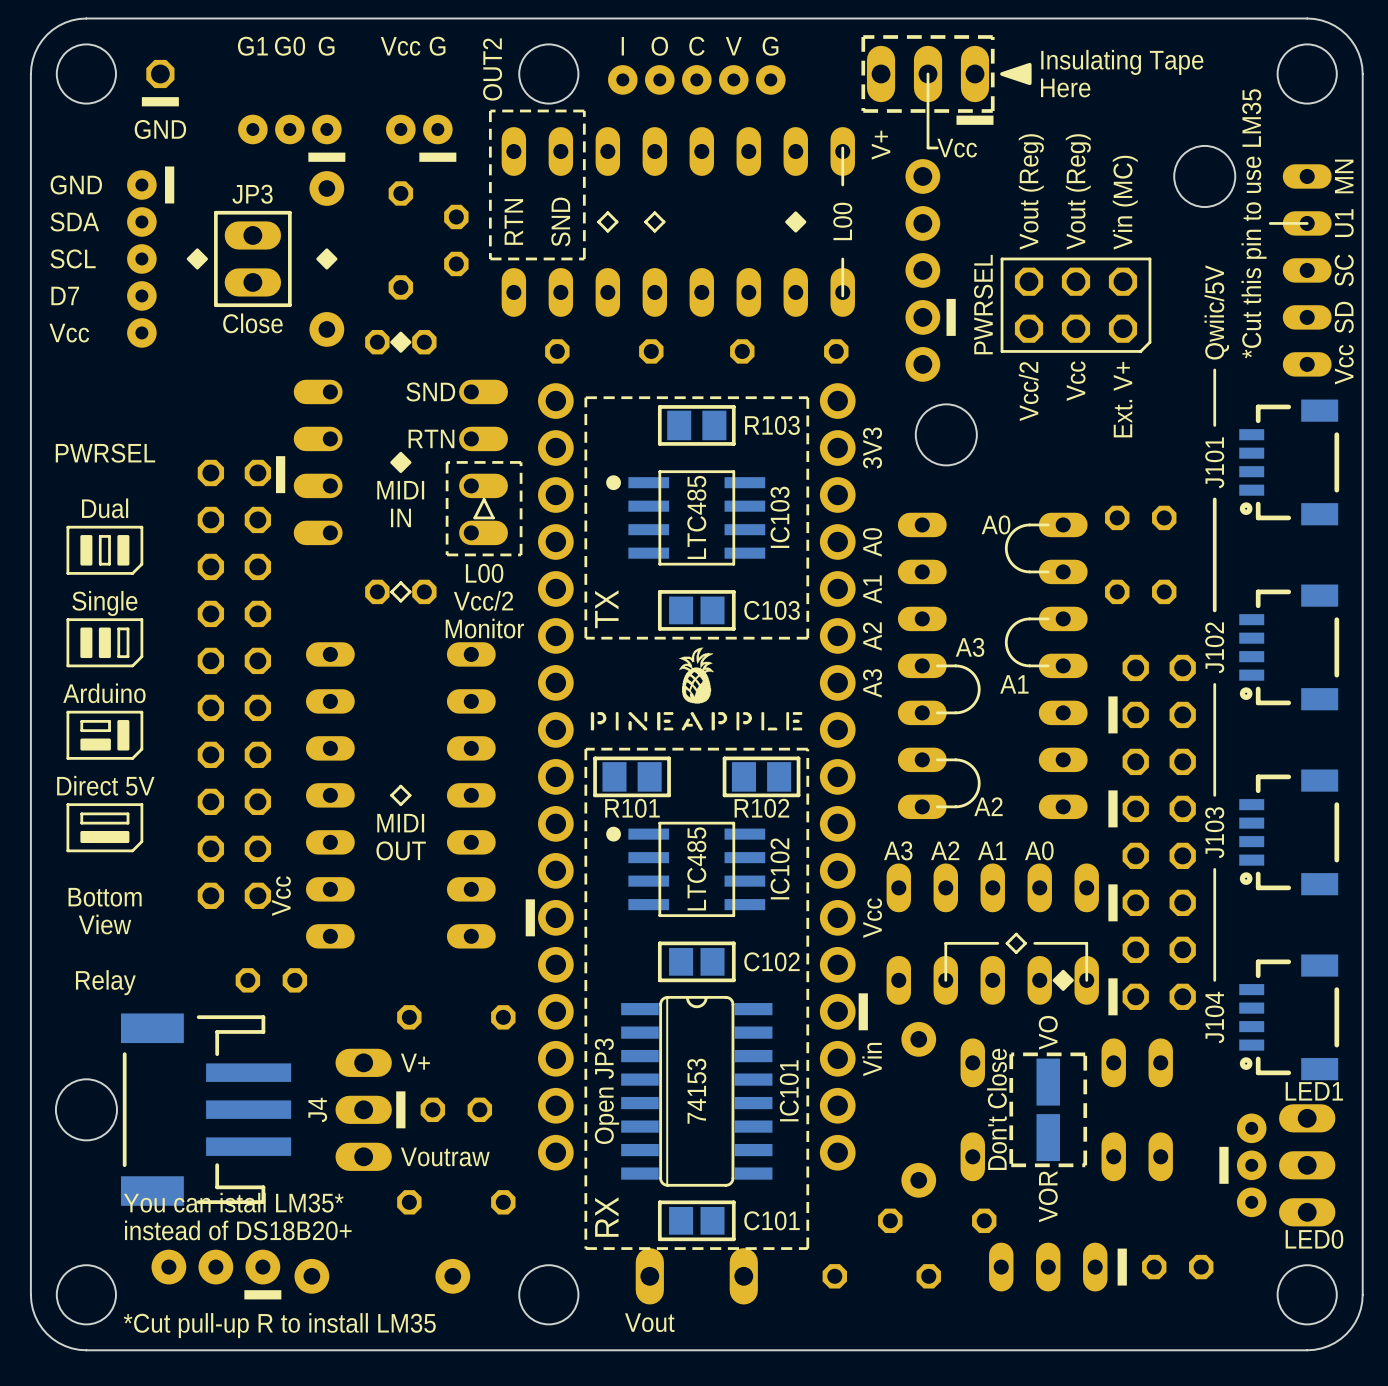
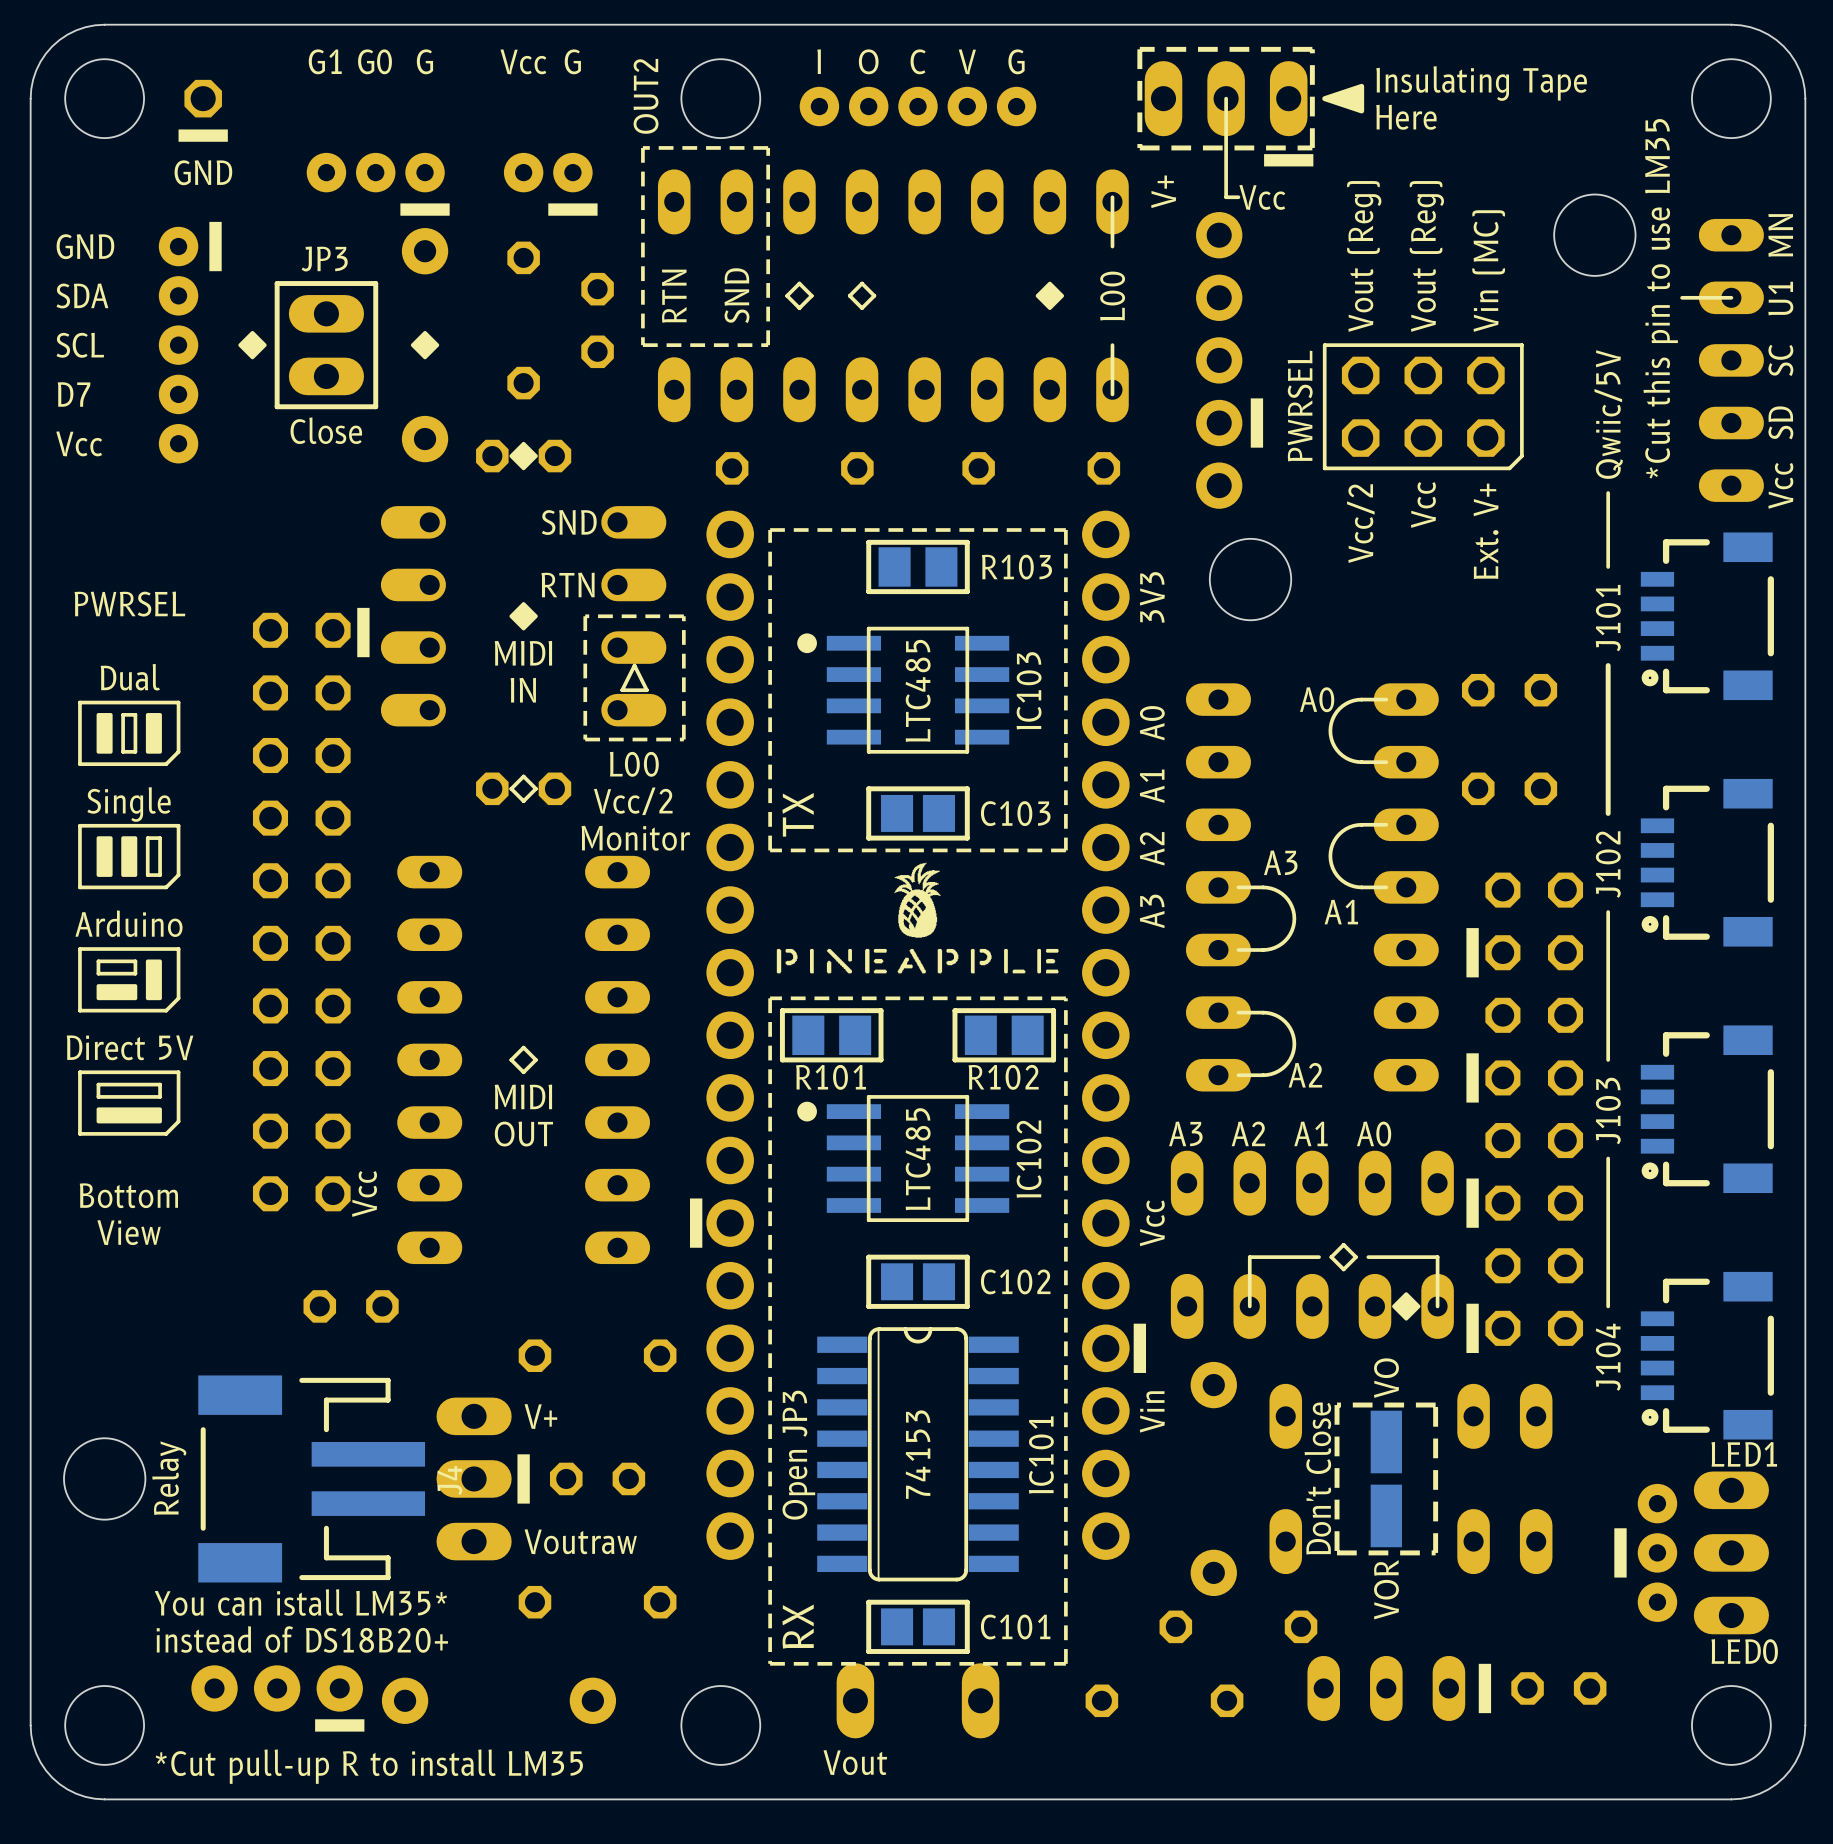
text rotation: 0° (105, 982) -> 90° counterclockwise (169, 1478)
text position: Relay (105, 982) -> Relay (169, 1478)
J4 footprint: [120, 1013, 292, 1206] -> [198, 1375, 426, 1583]

